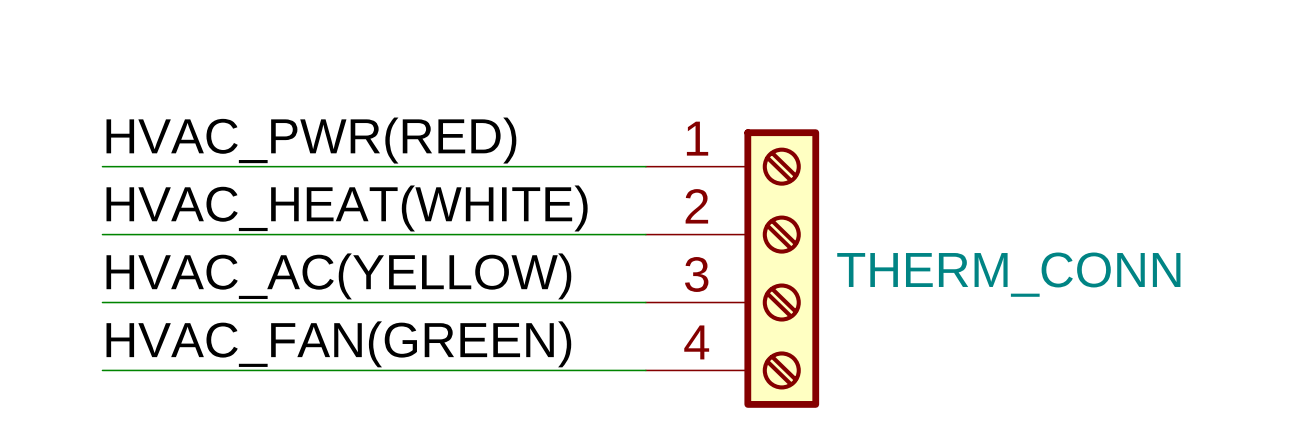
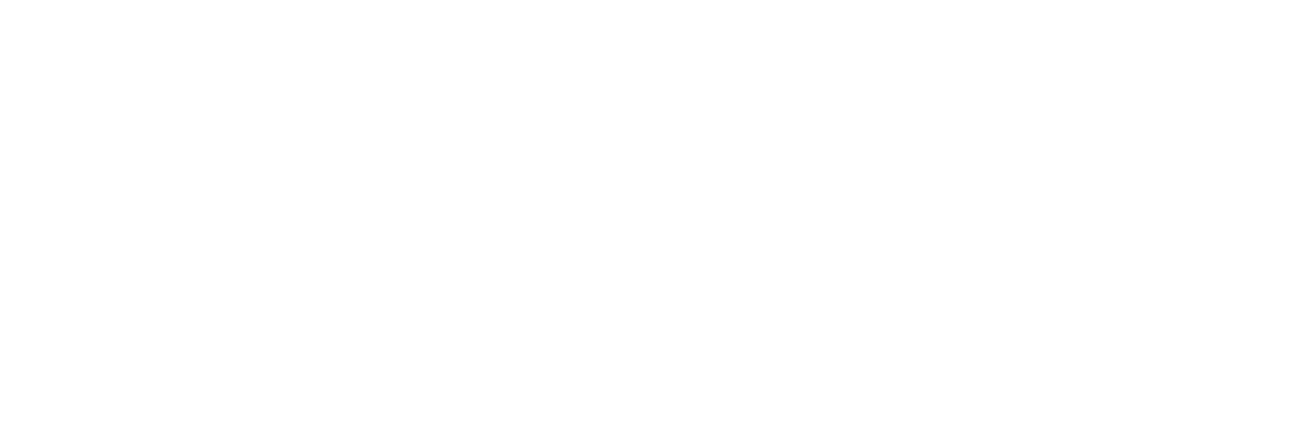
label: HVAC_PWR(RED) (311, 140) -> none
wire: (102, 166) (645, 166) -> none
label: HVAC_HEAT(WHITE) (347, 208) -> none
wire: (102, 234) (645, 234) -> none
THERM_CONN: (732, 268) -> none
label: HVAC_AC(YELLOW) (338, 276) -> none
wire: (102, 302) (645, 302) -> none
label: HVAC_FAN(GREEN) (338, 344) -> none
wire: (102, 370) (645, 370) -> none

